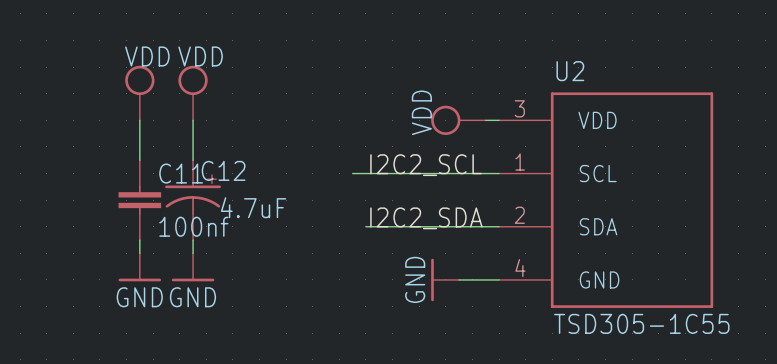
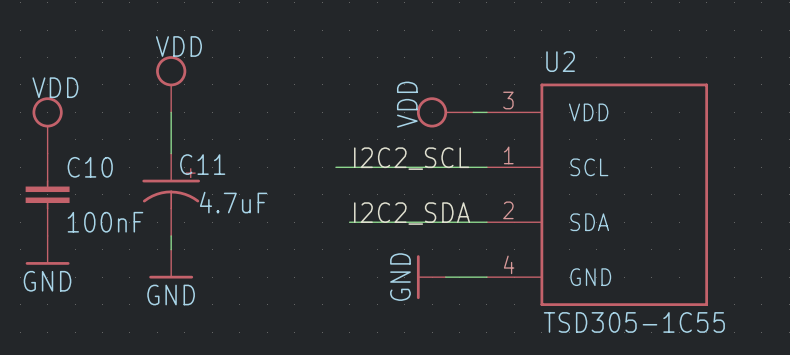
power symbol position: VDD (139, 93) -> VDD (47, 125)
wire: (139, 120) (139, 160) -> none
C12 name: C12 (223, 170) -> C11 (202, 164)
C10: none -> 100nF (47, 194)
C11: 100nf (139, 200) -> none
wire: (139, 240) (139, 253) -> none
power symbol position: GND (139, 267) -> GND (47, 250)

